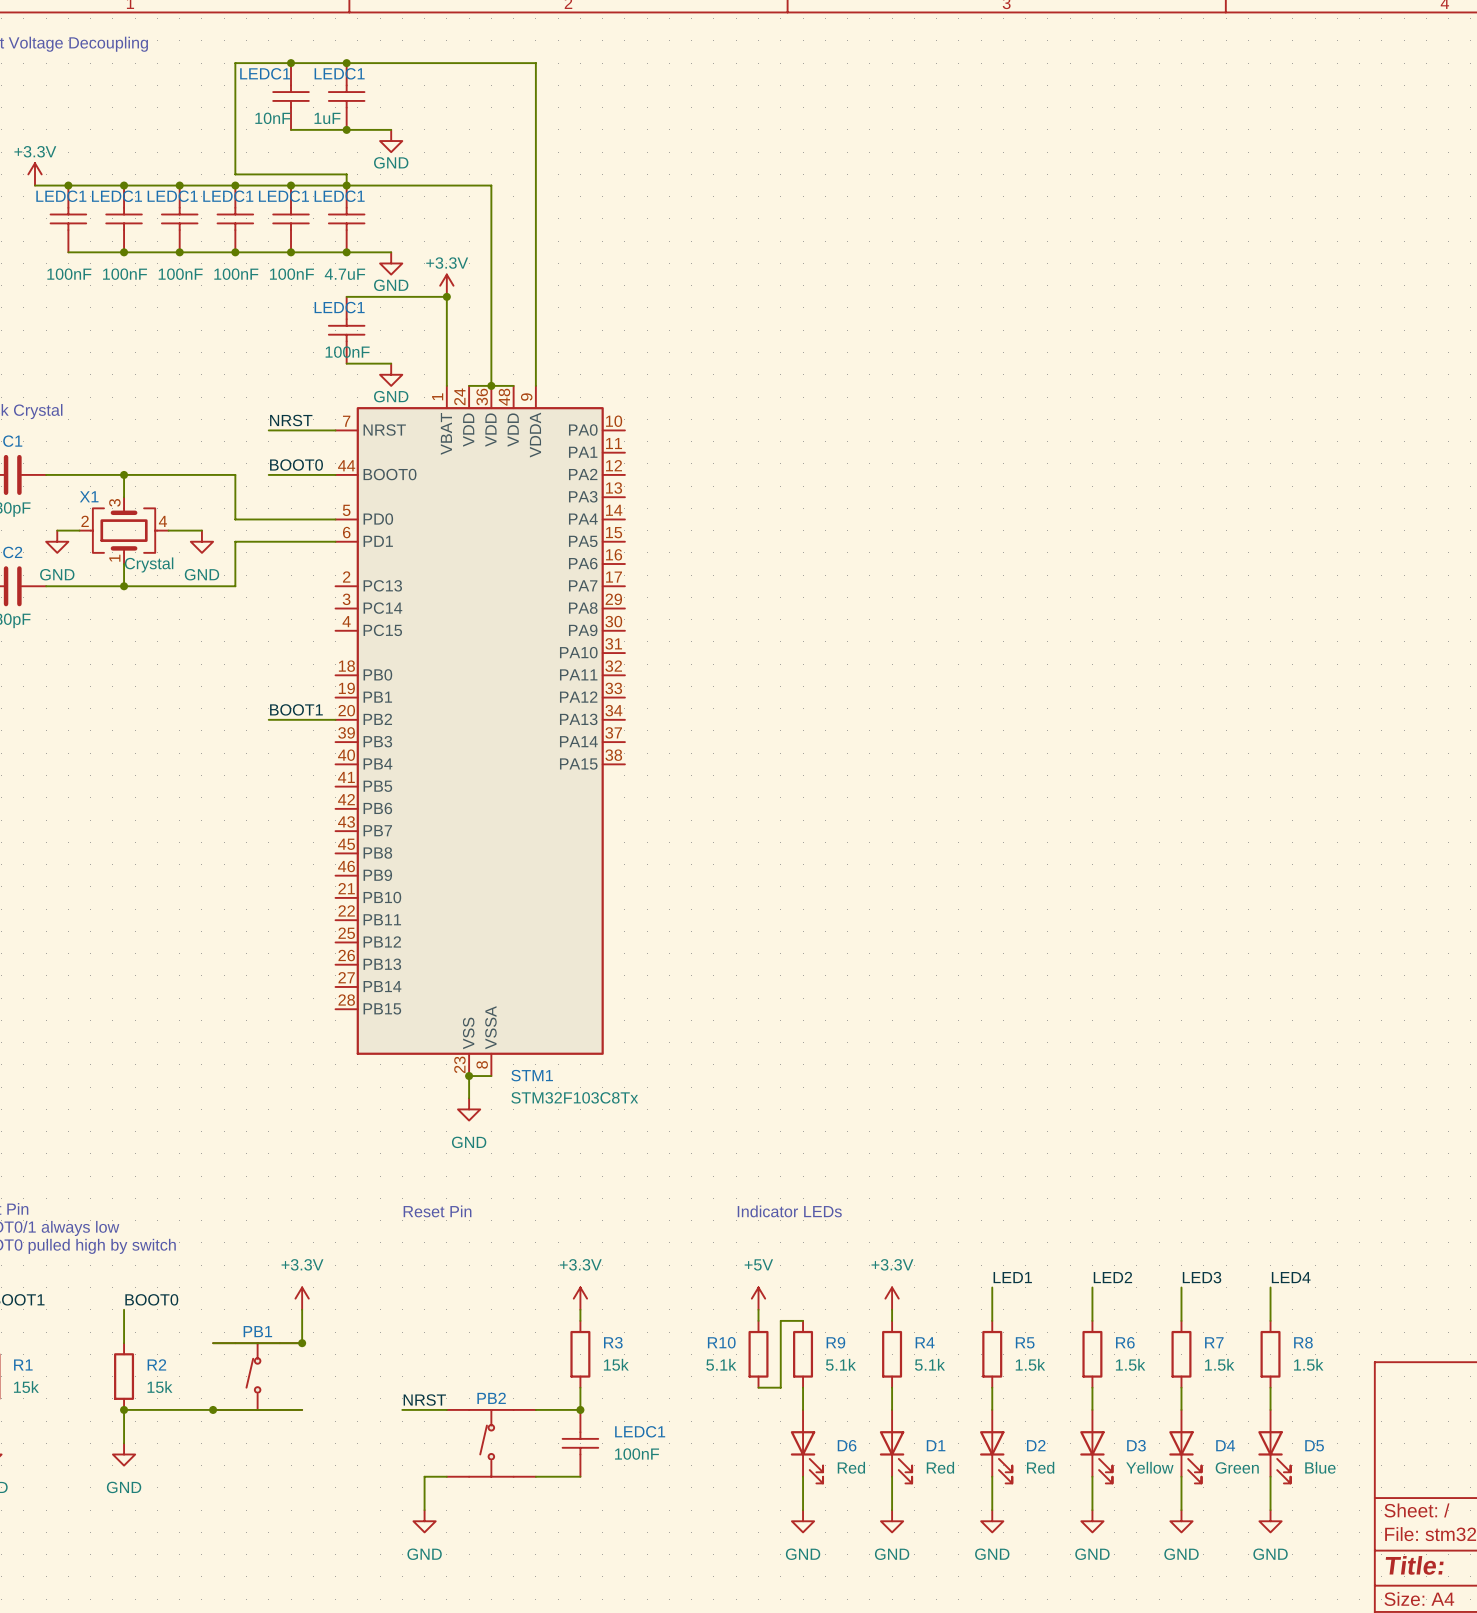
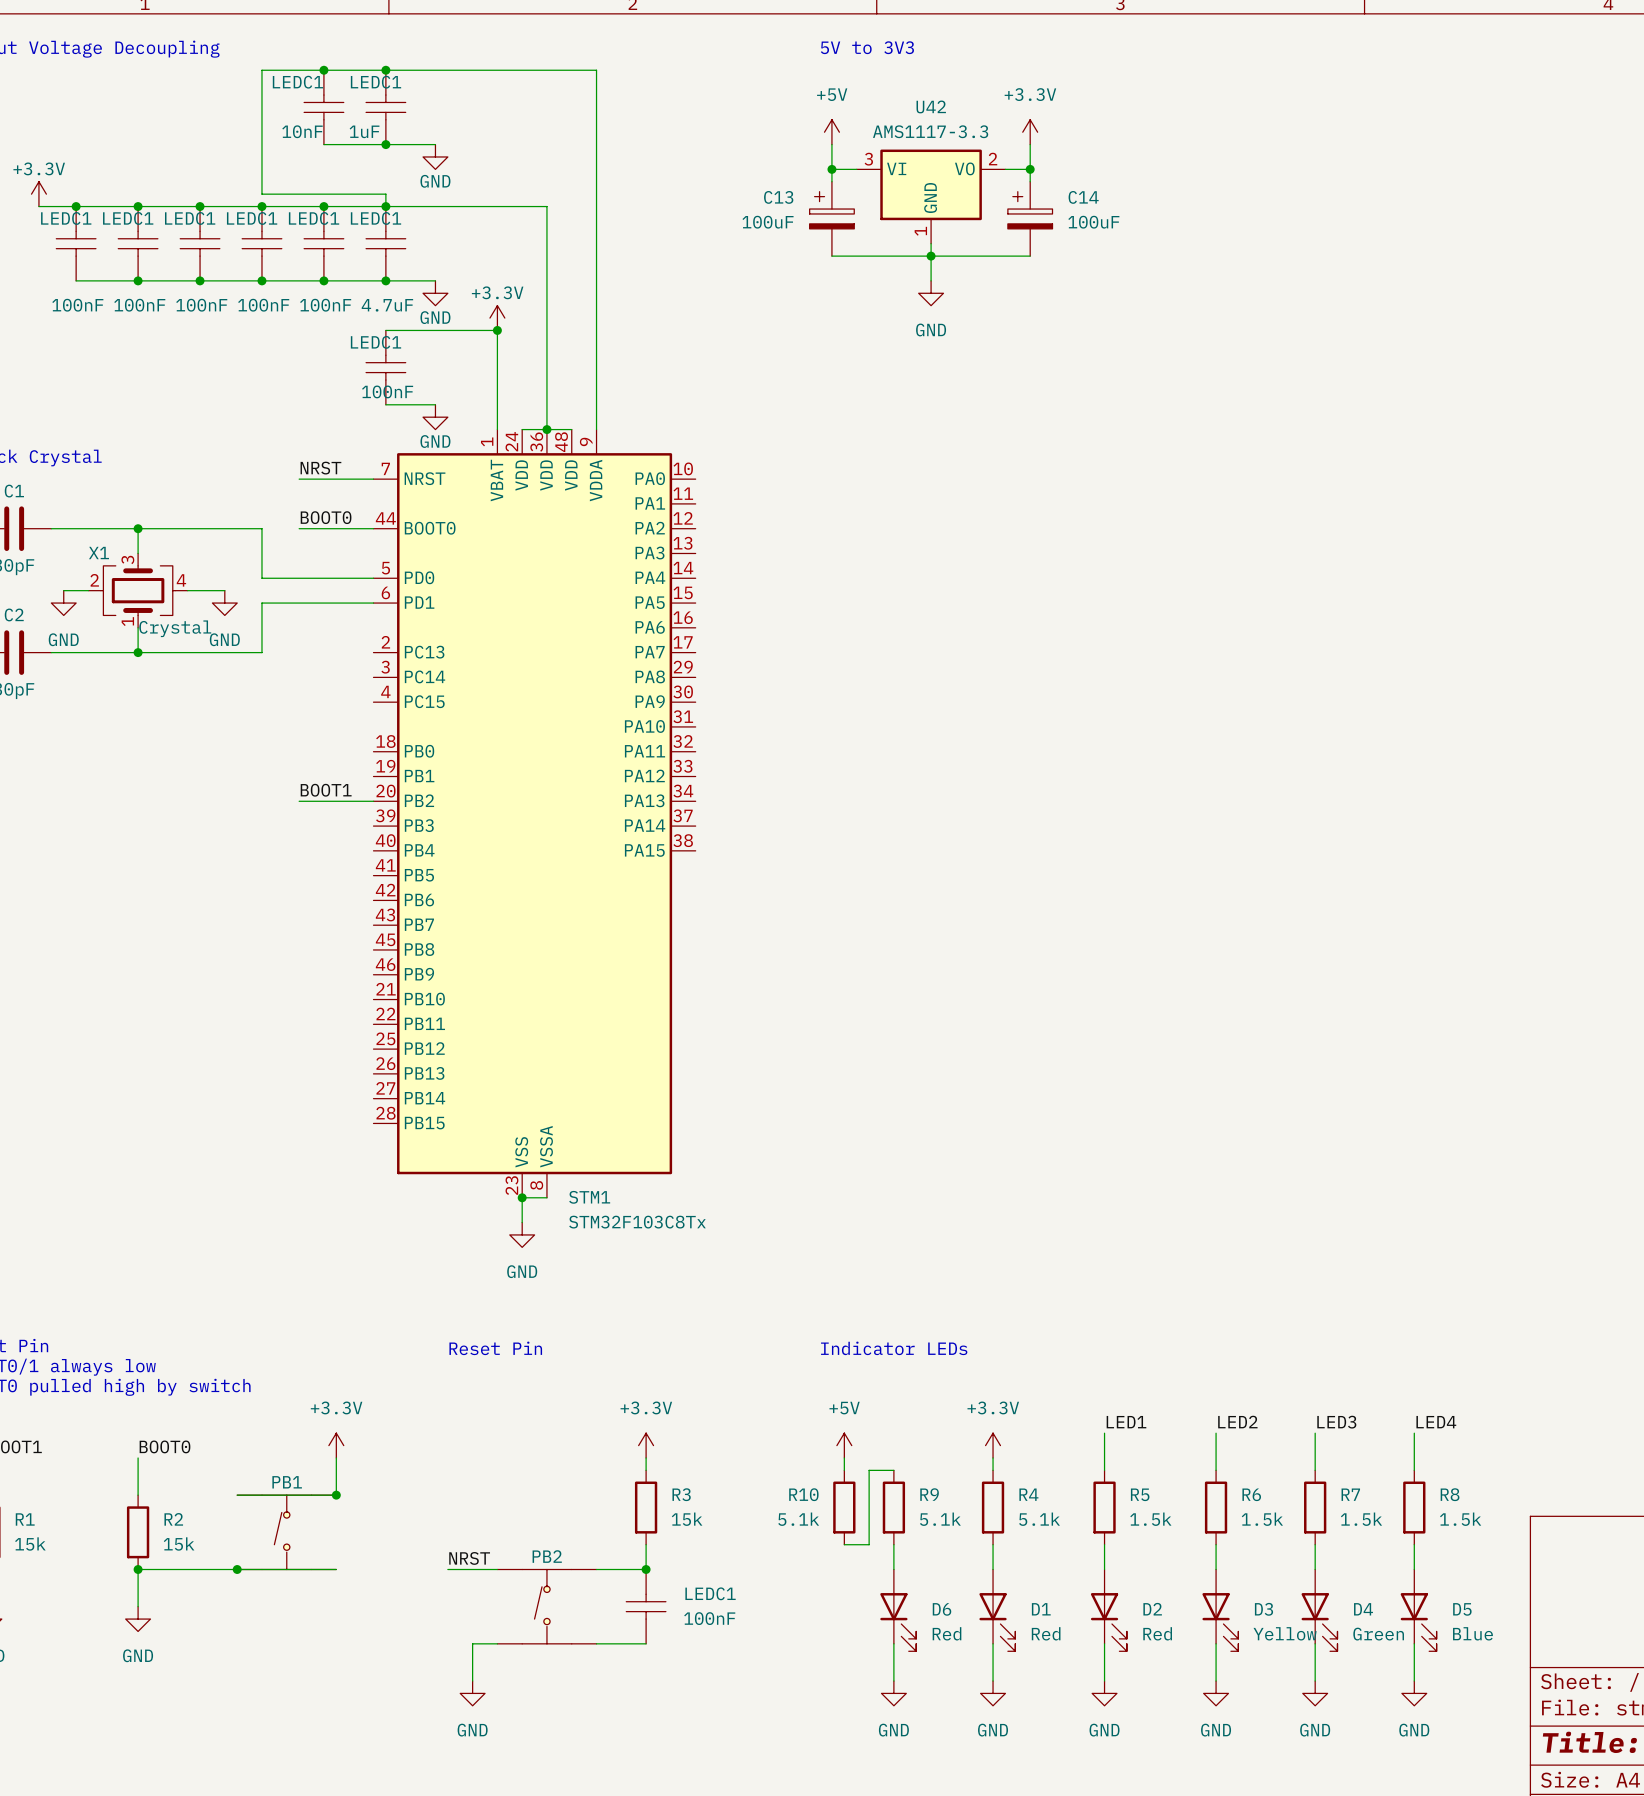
text: none -> 5V to 3V3 (867, 47)
power symbol: none -> +5V (831, 132)
power symbol: none -> +3.3V (1030, 132)
wire: none -> (831, 144) (831, 181)
wire: none -> (1030, 144) (1030, 181)
wire: none -> (831, 169) (856, 169)
junction: none -> (831, 169)
wire: none -> (1005, 169) (1030, 169)
junction: none -> (1030, 169)
U42: none -> AMS1117-3.3 (931, 196)
C13: none -> 100uF (831, 218)
C14: none -> 100uF (1030, 218)
wire: none -> (931, 243) (931, 280)
wire: none -> (831, 256) (1030, 256)
junction: none -> (931, 256)
power symbol: none -> GND (931, 293)

